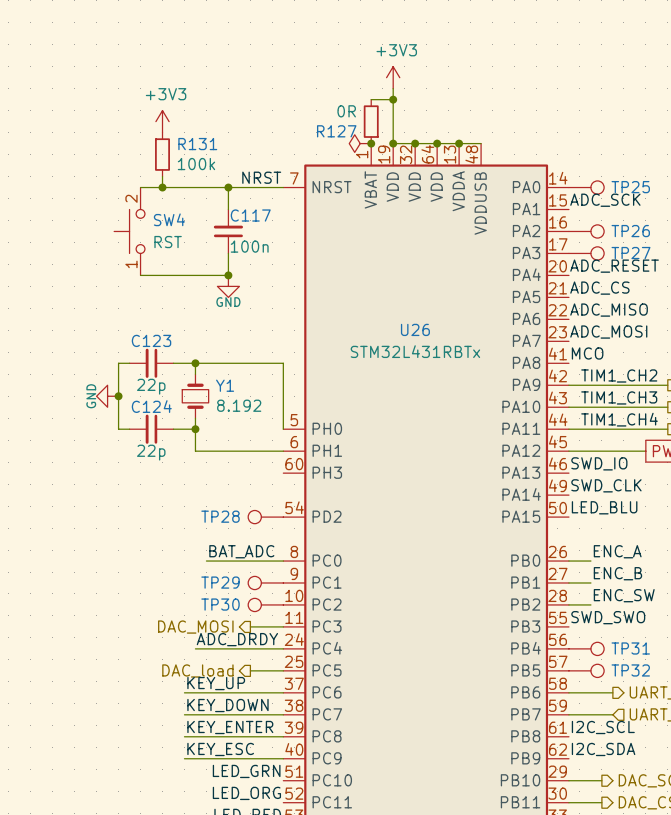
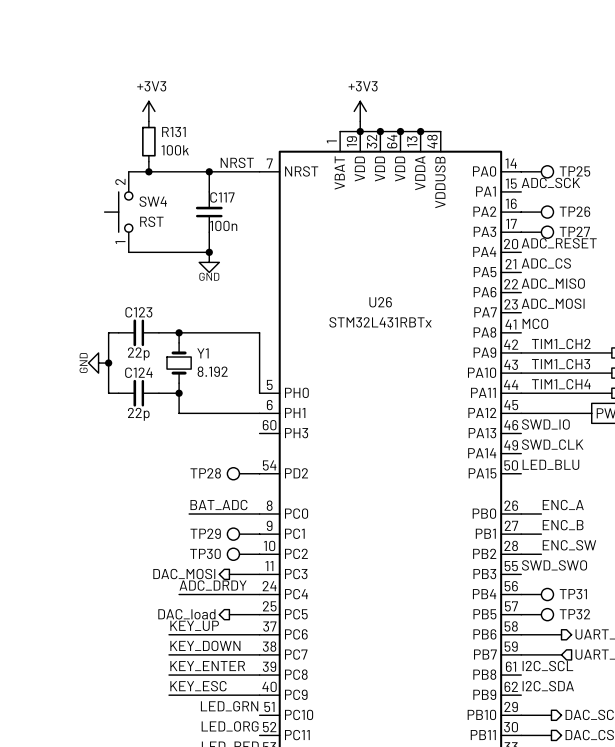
power symbol position: +3V3 (393, 77) -> +3V3 (360, 111)
wire: (371, 99) (393, 99) -> (340, 131) (360, 131)
junction: (393, 99) -> none
R127: 0R (371, 121) -> none
power symbol: (360, 143) -> none
junction: (371, 143) -> none

